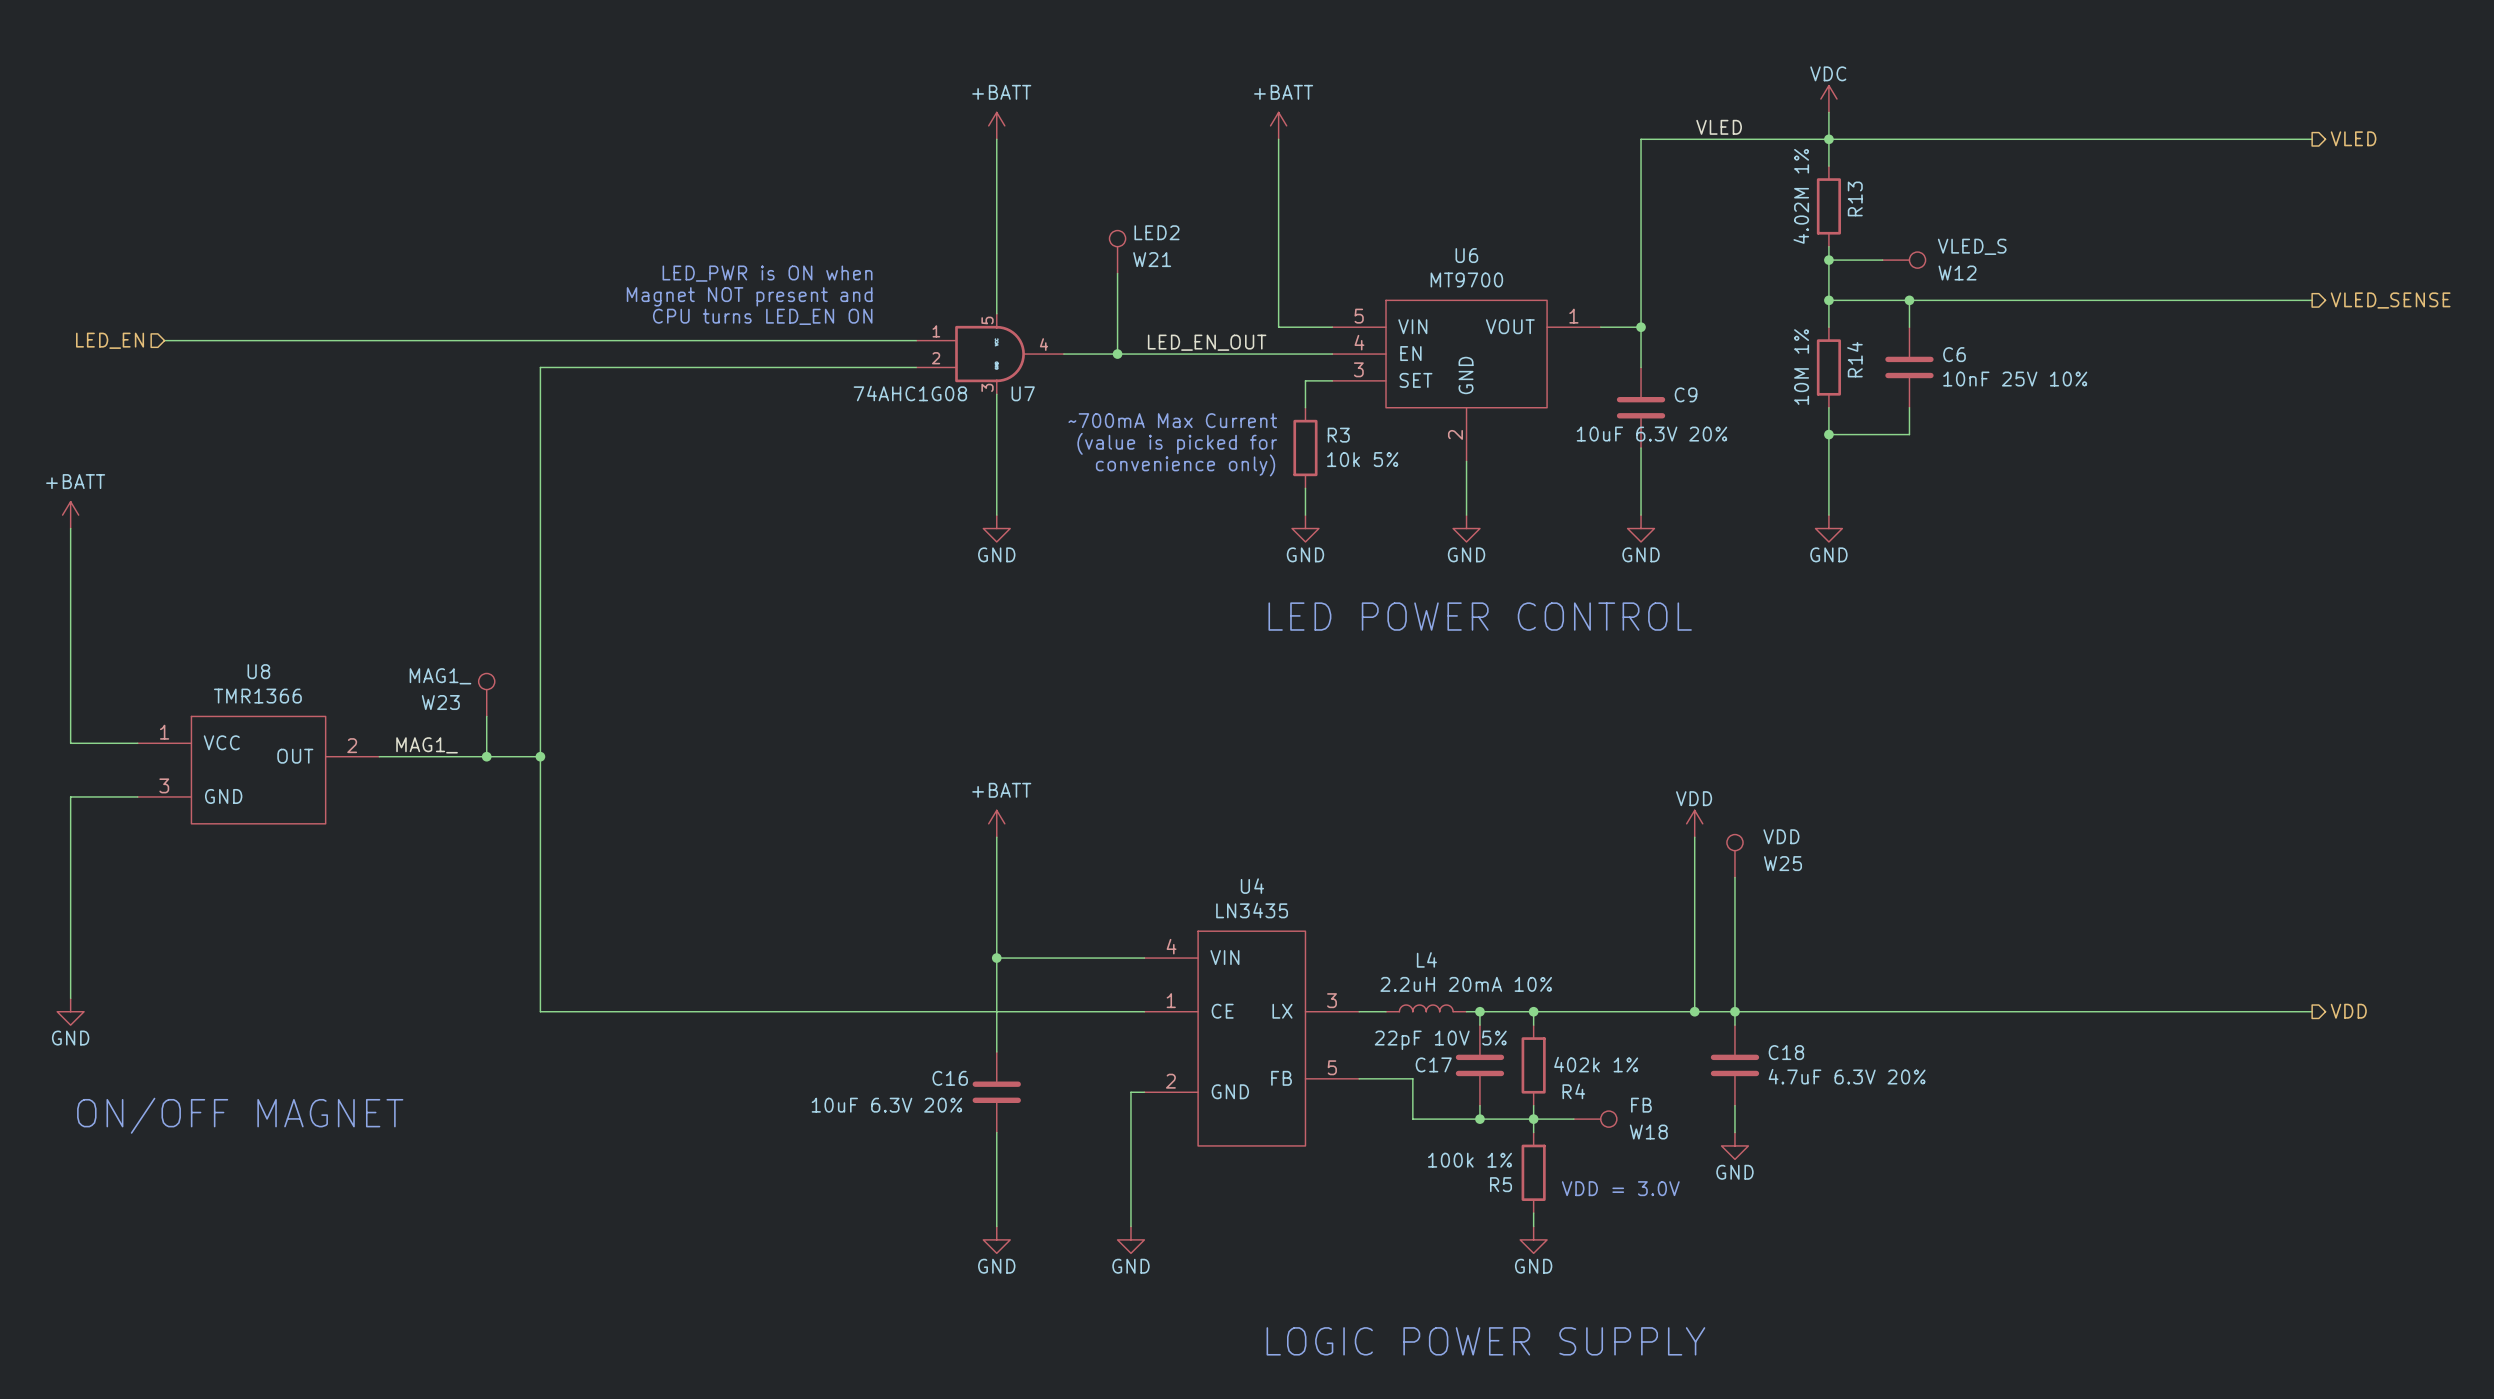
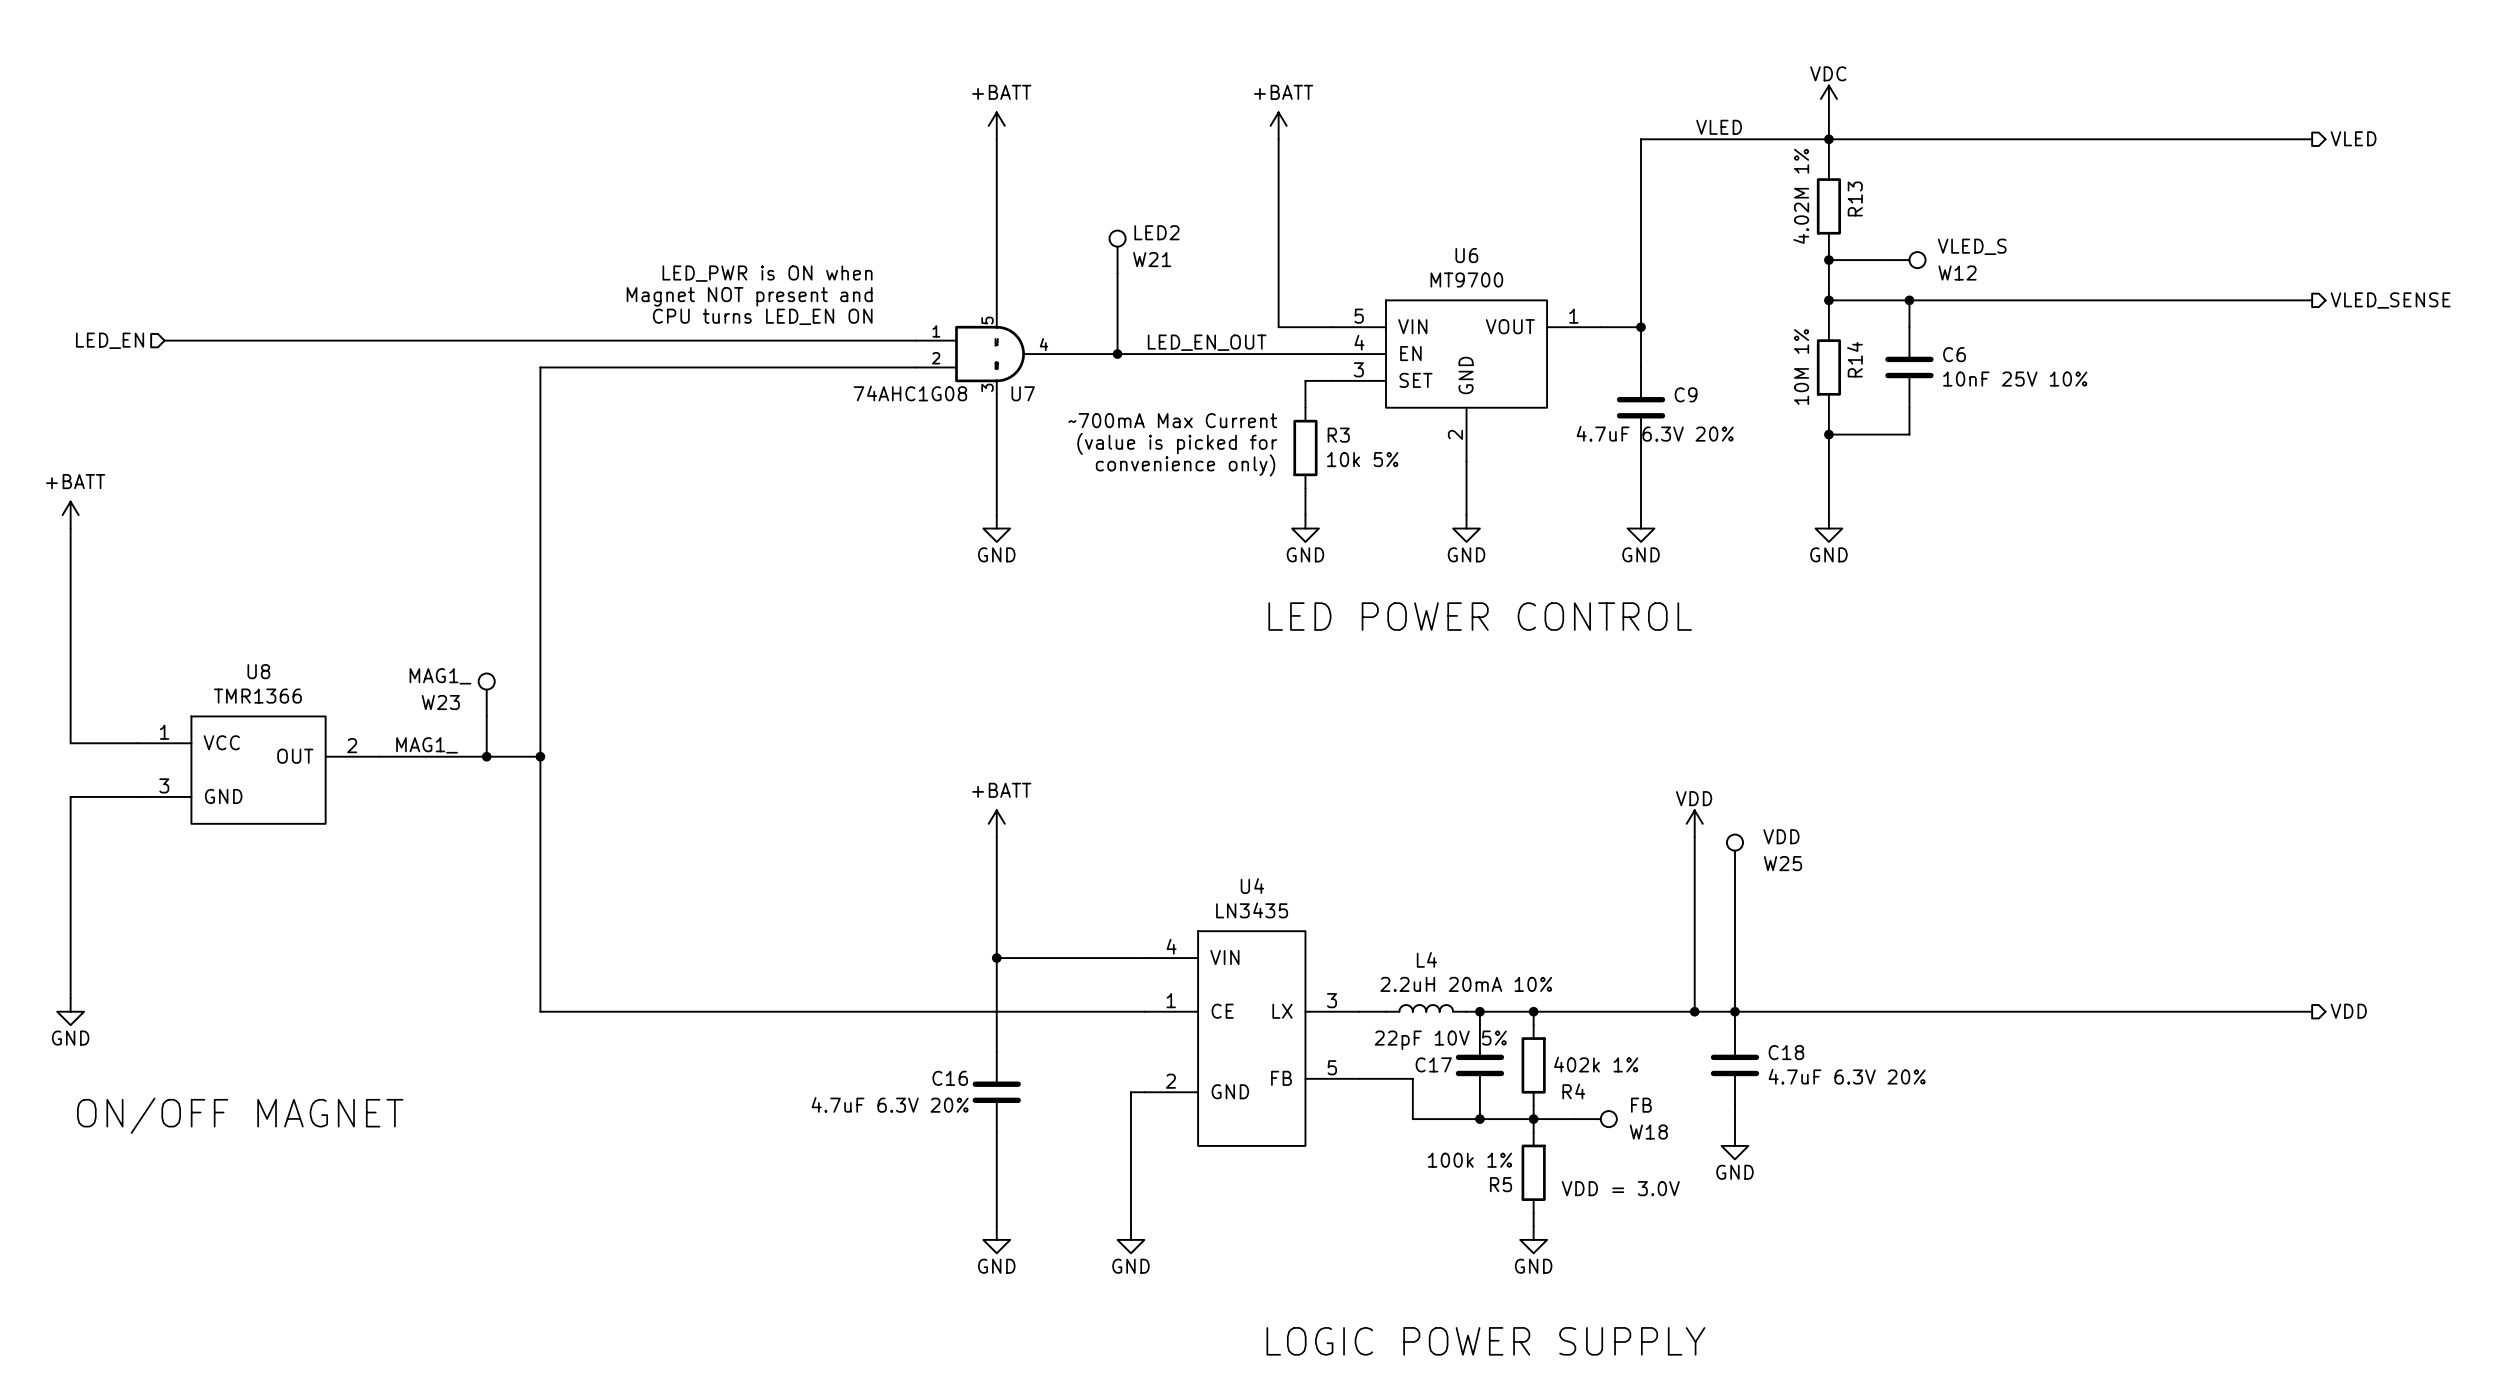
C9 value: 10uF 6.3V 20% (1651, 434) -> 4.7uF 6.3V 20% (1655, 433)
C16 value: 10uF 6.3V 20% (886, 1105) -> 4.7uF 6.3V 20% (890, 1104)

